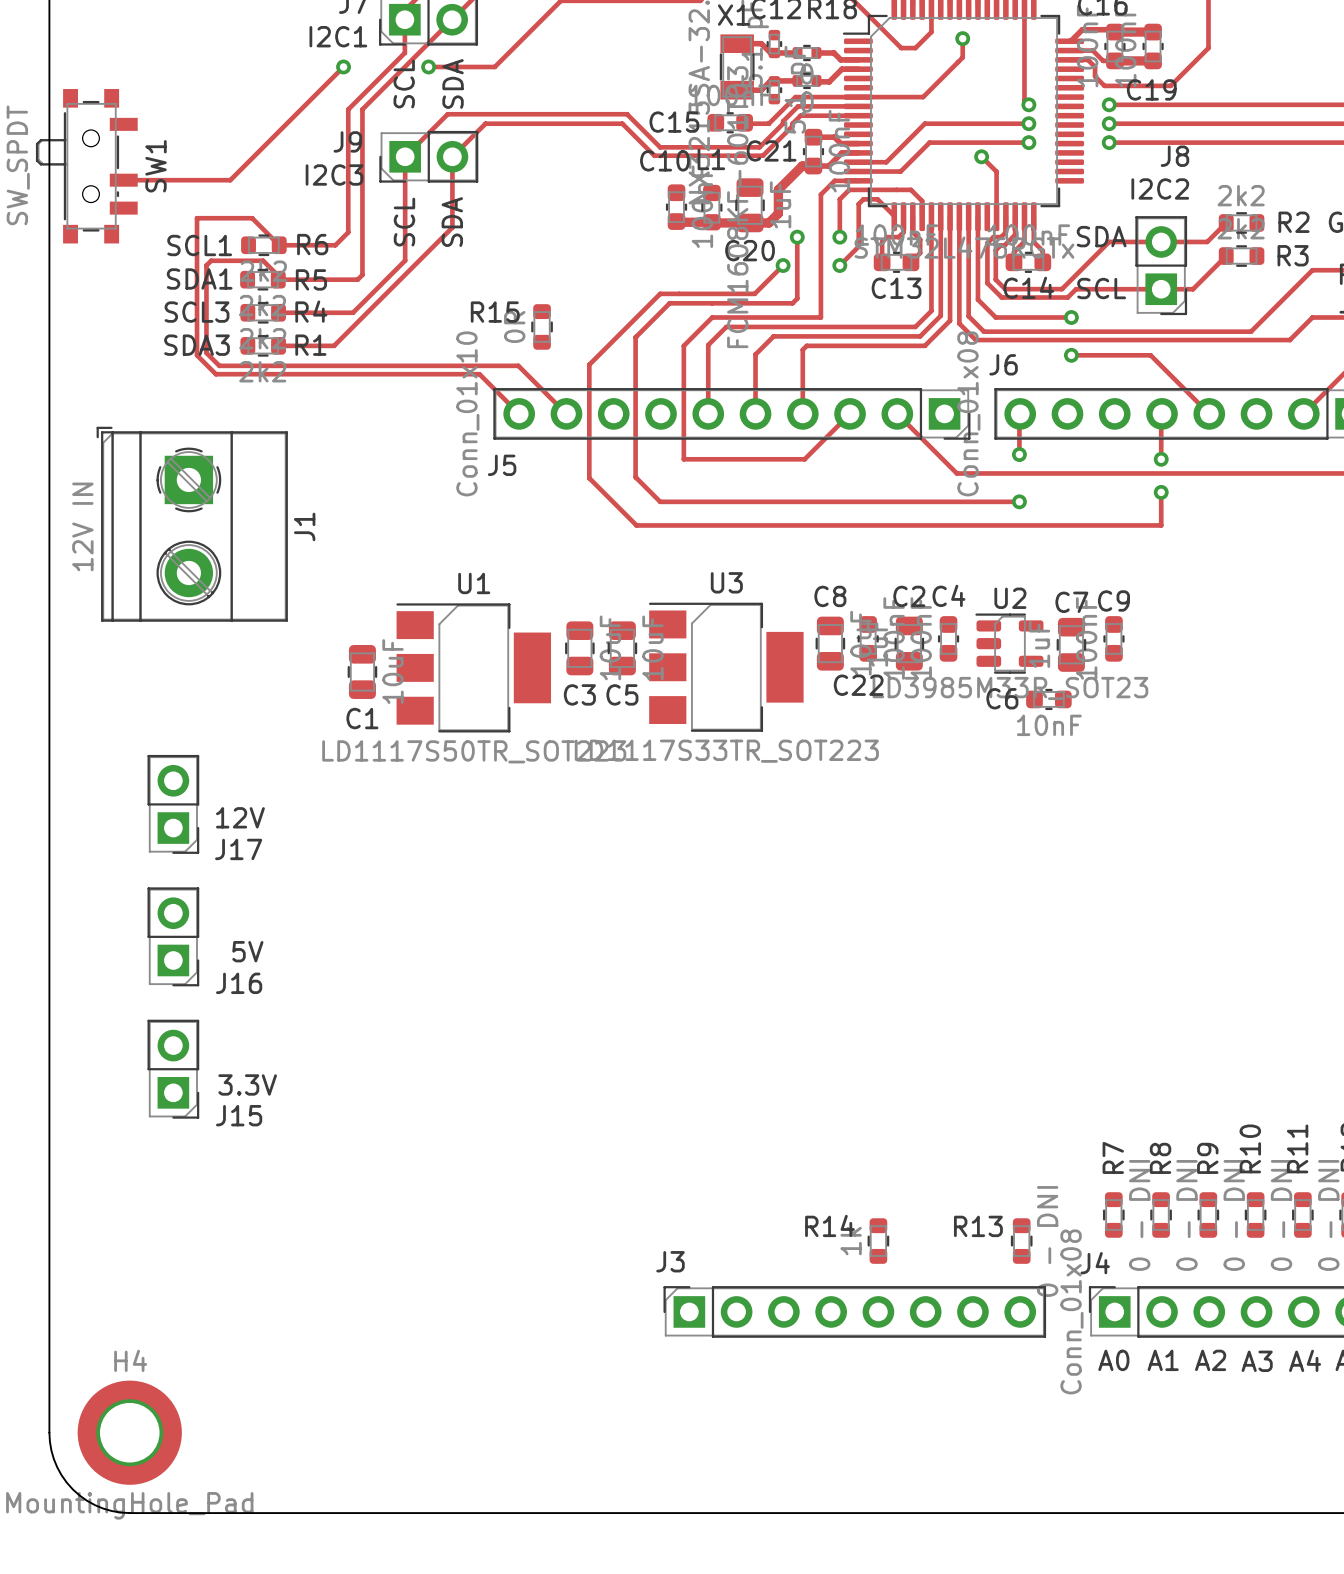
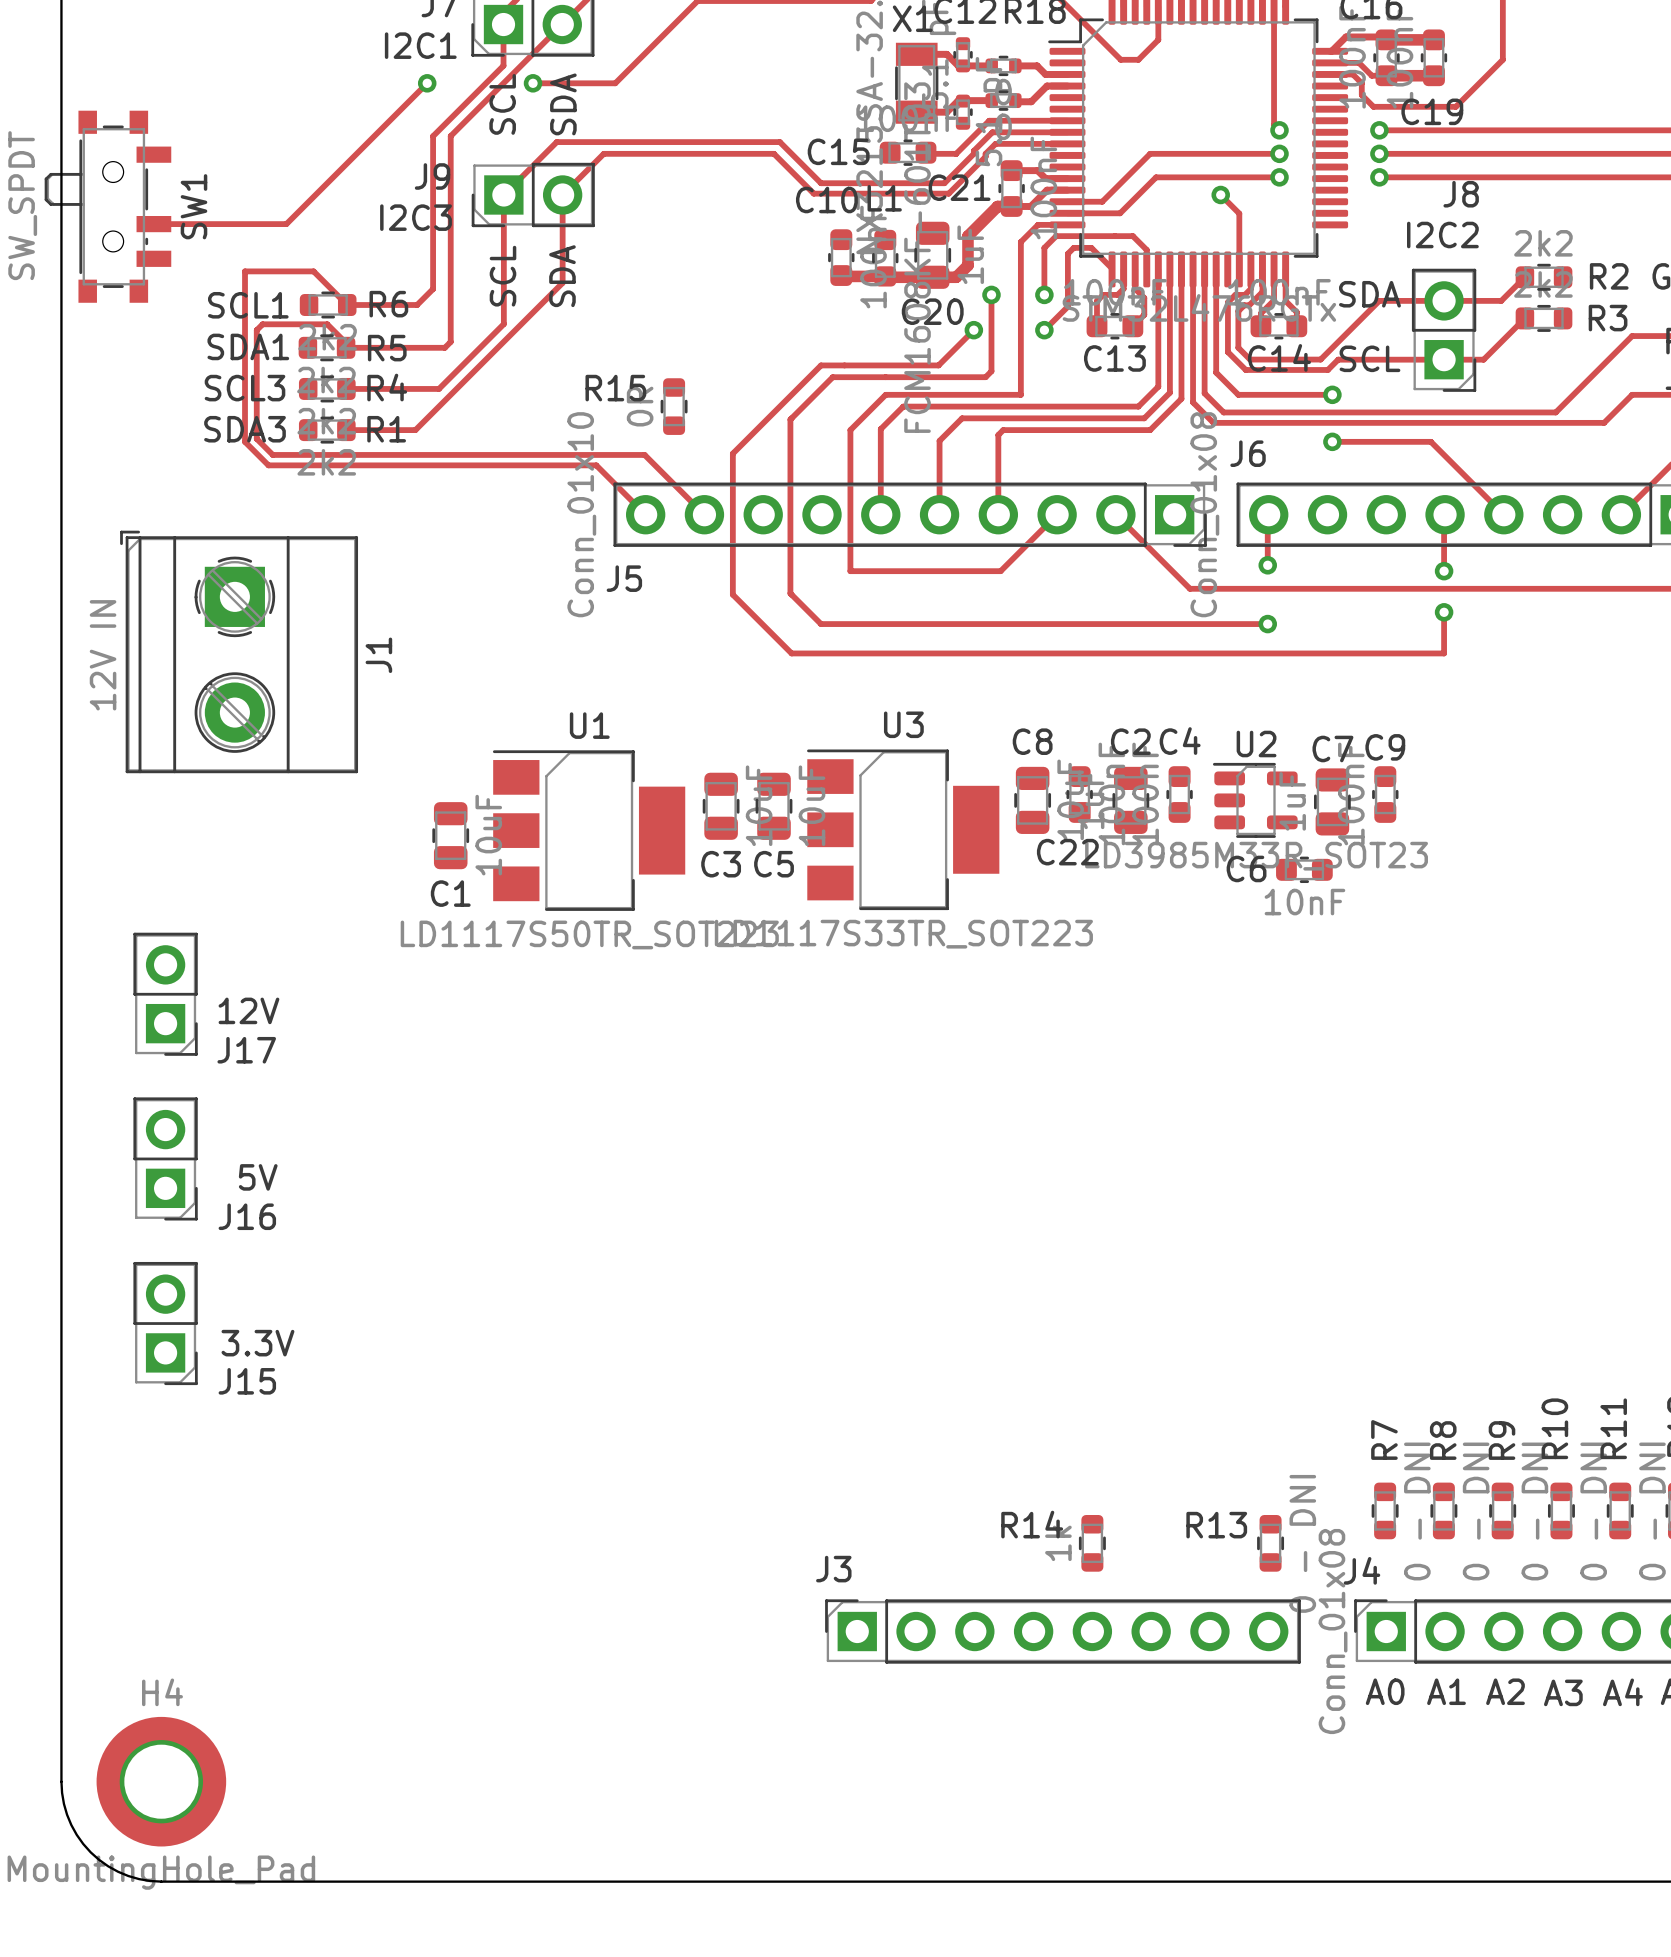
track: (962, 38) (962, 57) (923, 97) (858, 97) -> none
via: (962, 38) -> none
J17 position: (173, 804) -> (165, 994)
J16 position: (173, 936) -> (165, 1158)
J15 position: (173, 1069) -> (165, 1323)

